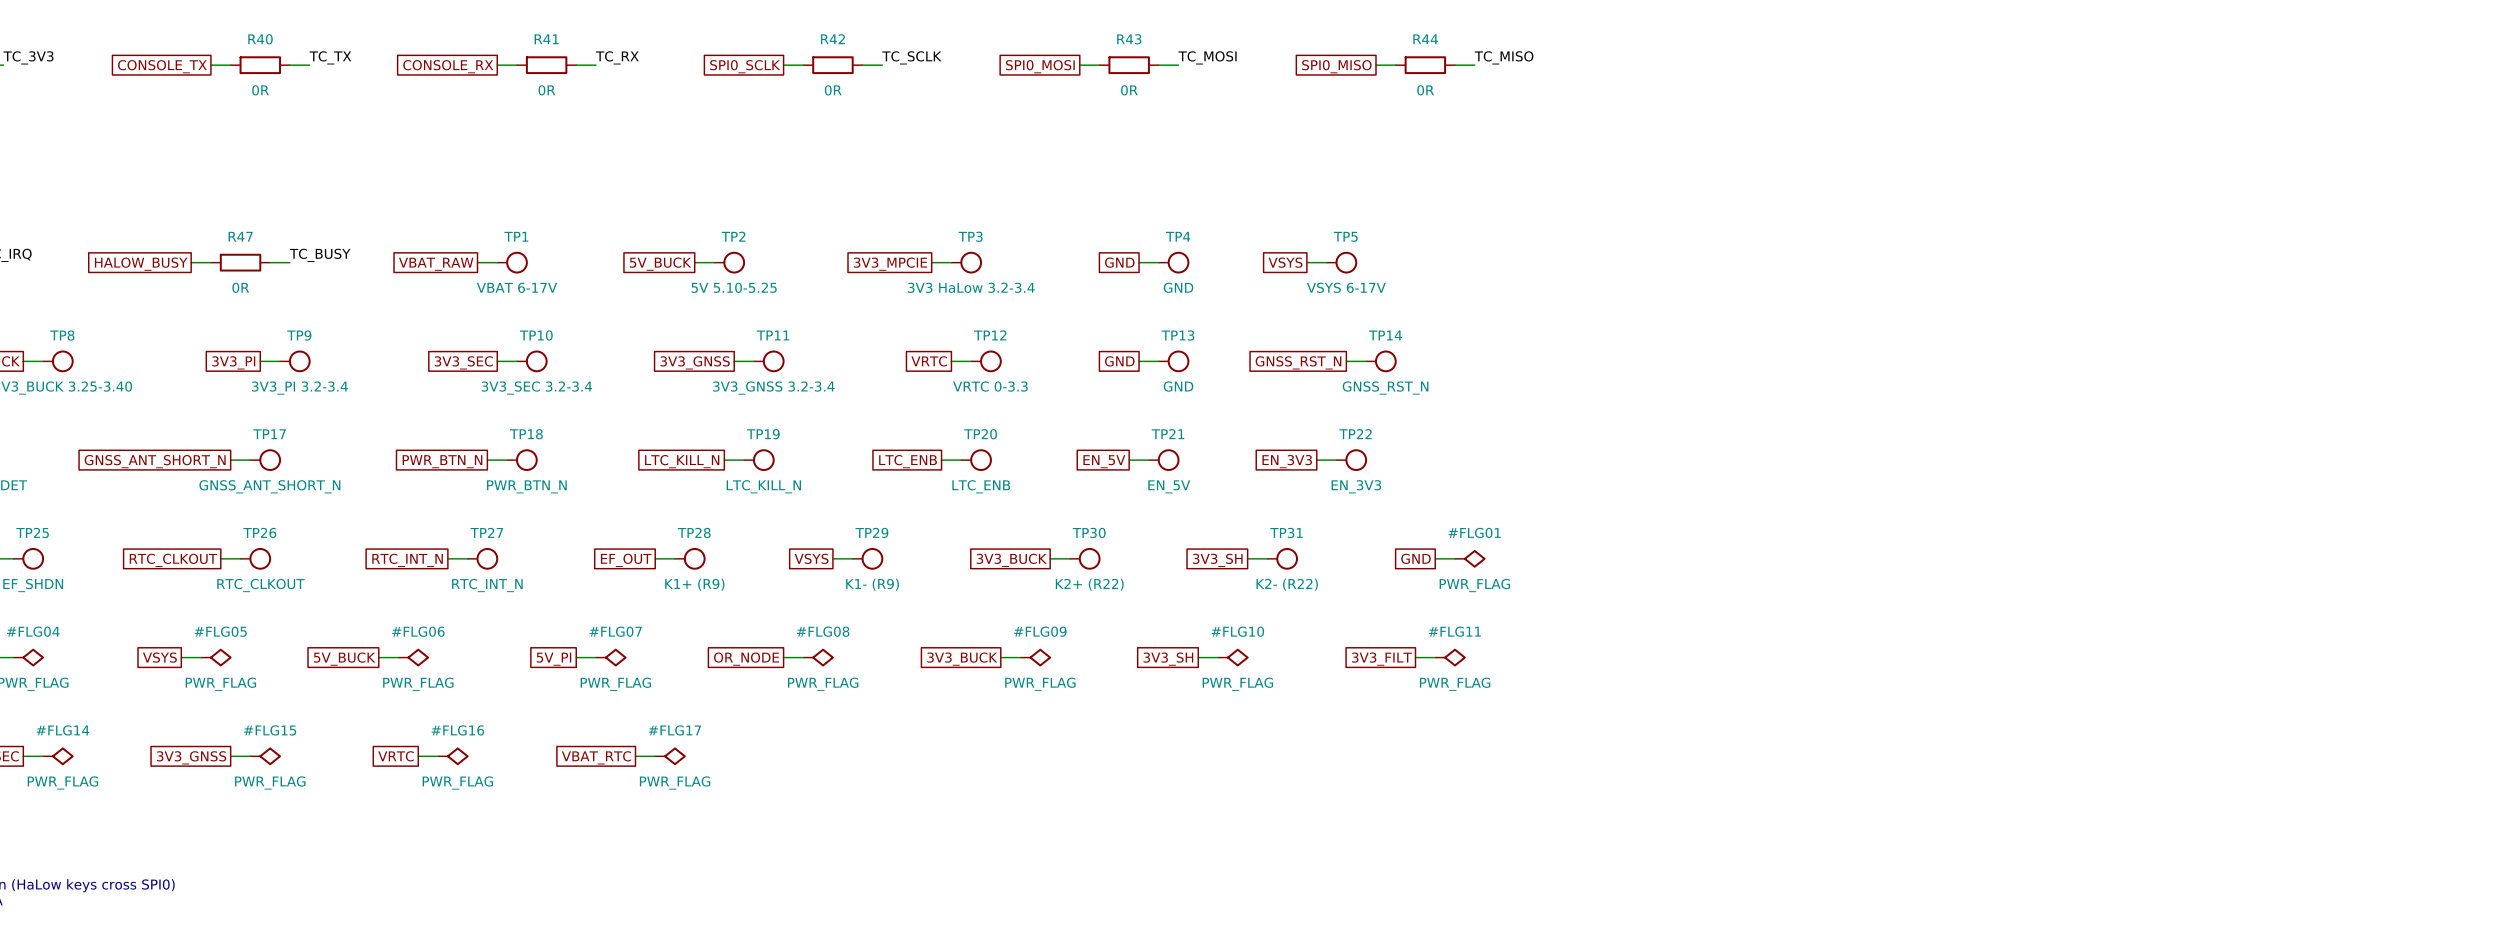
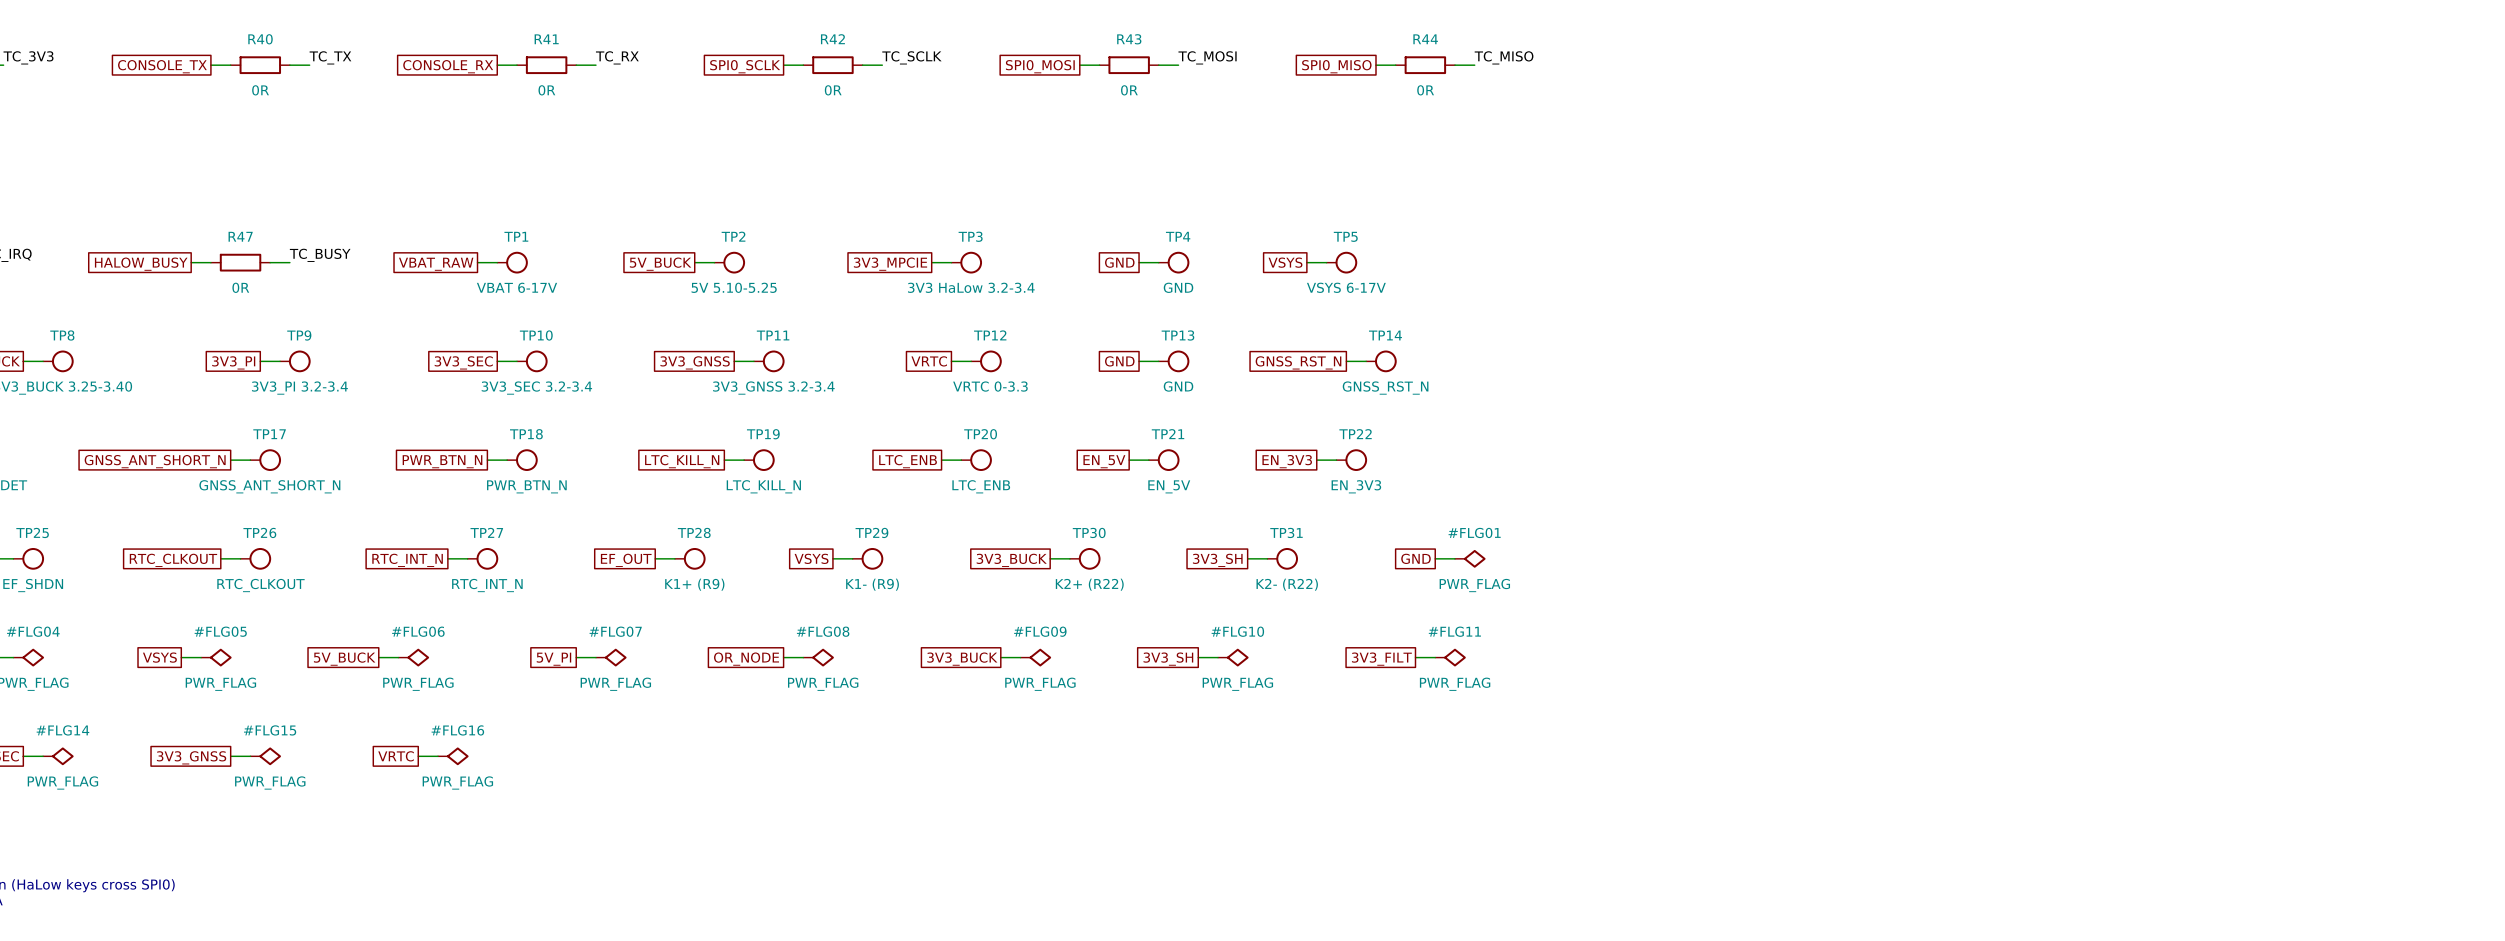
wire: (635, 756) (655, 756) -> none
#FLG17: PWR_FLAG (670, 756) -> none
global label: VBAT_RTC (596, 757) -> none

